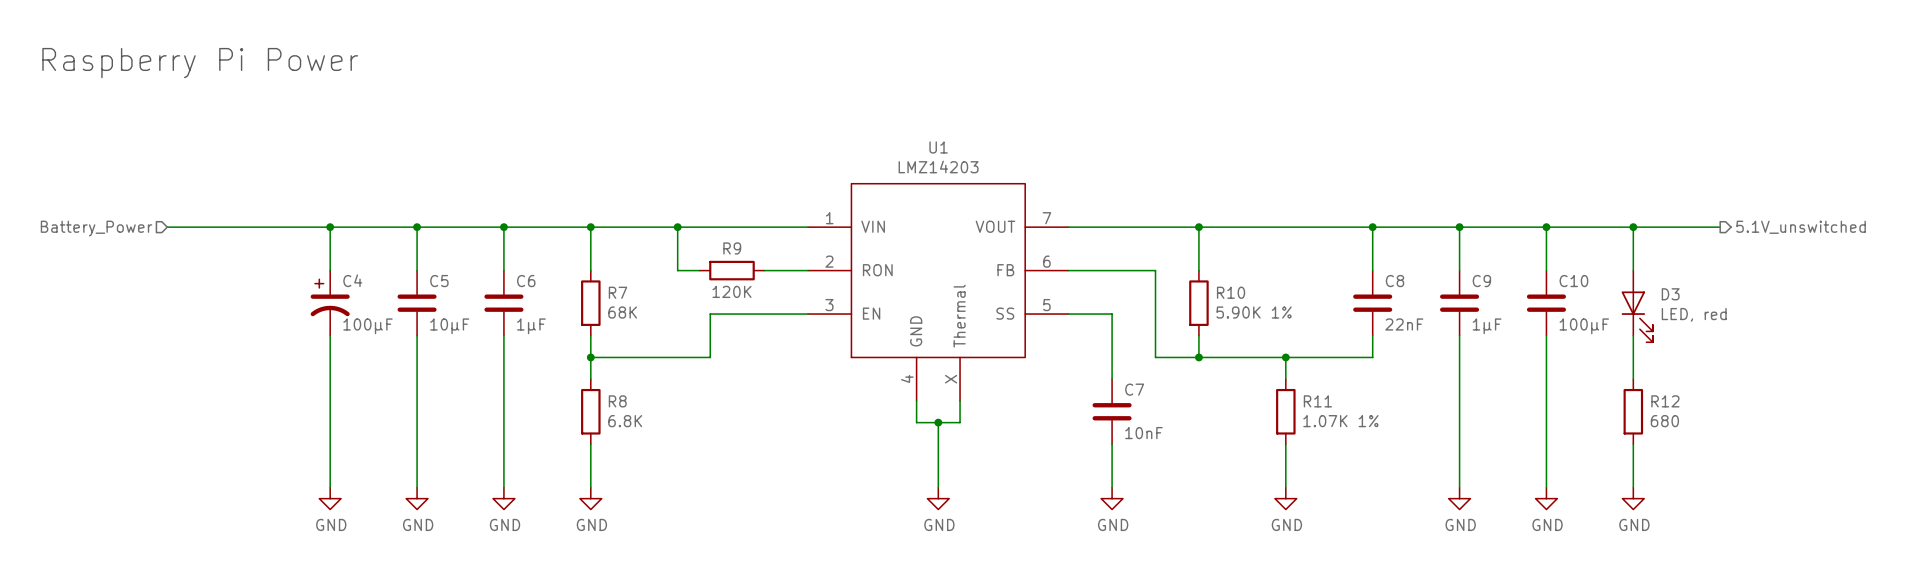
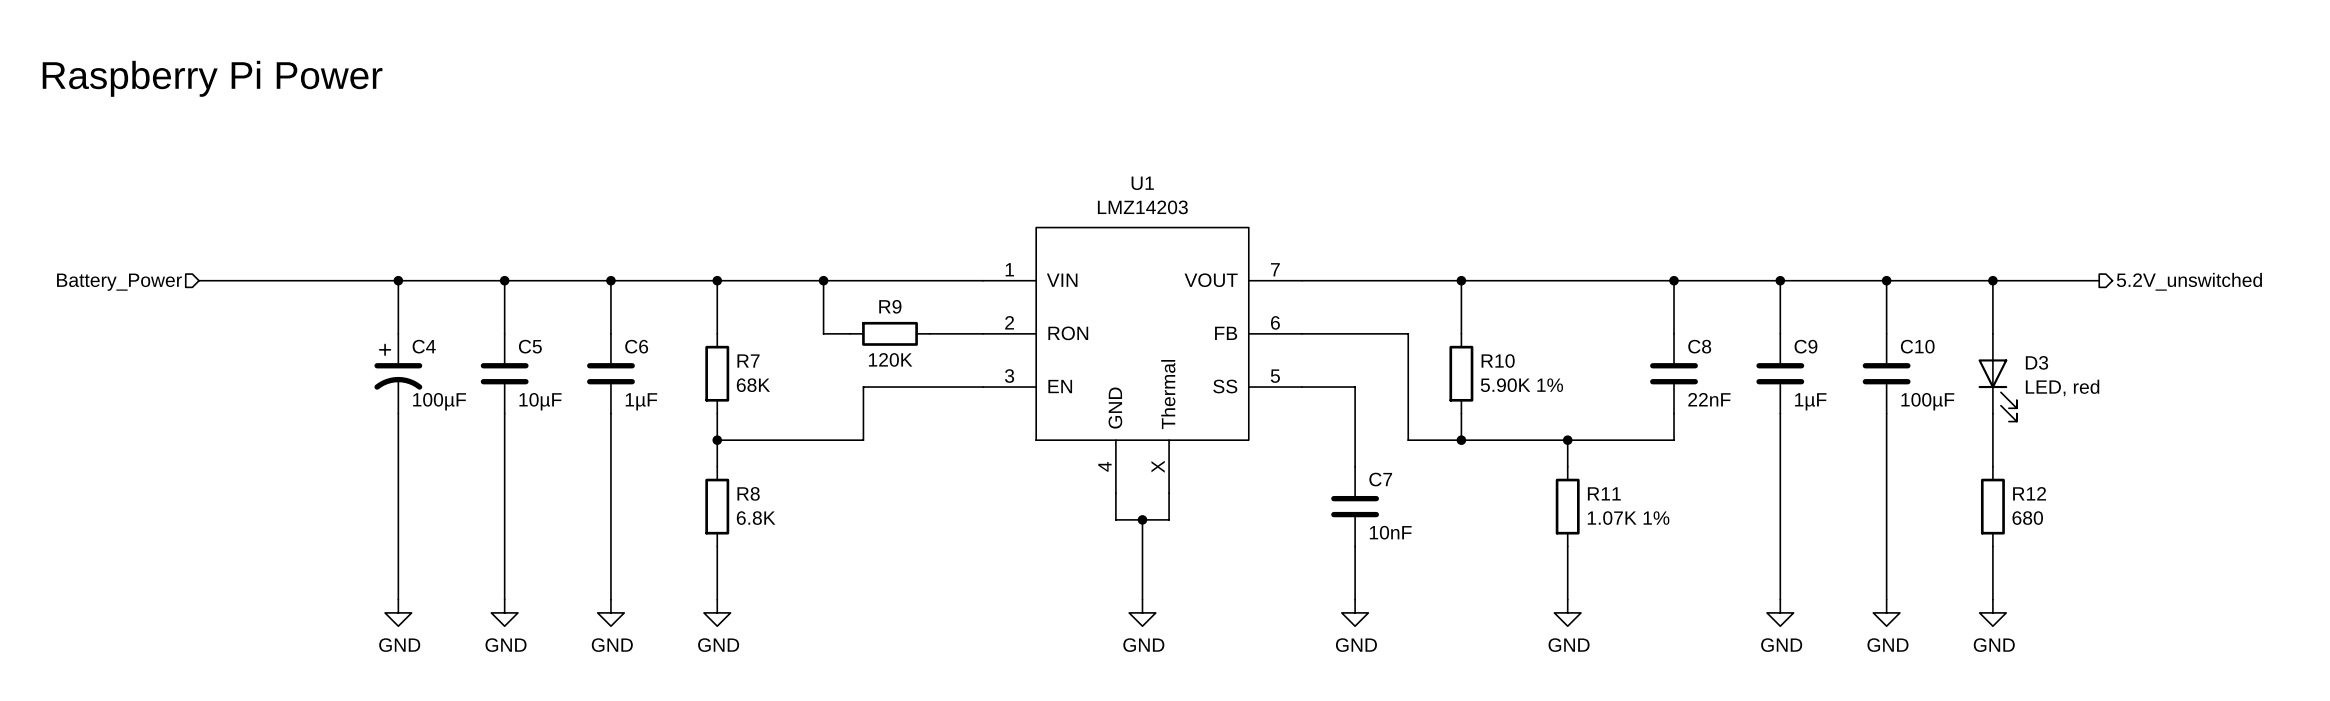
hierarchical label: 5.1V_unswitched (1801, 227) -> 5.2V_unswitched (2189, 281)

